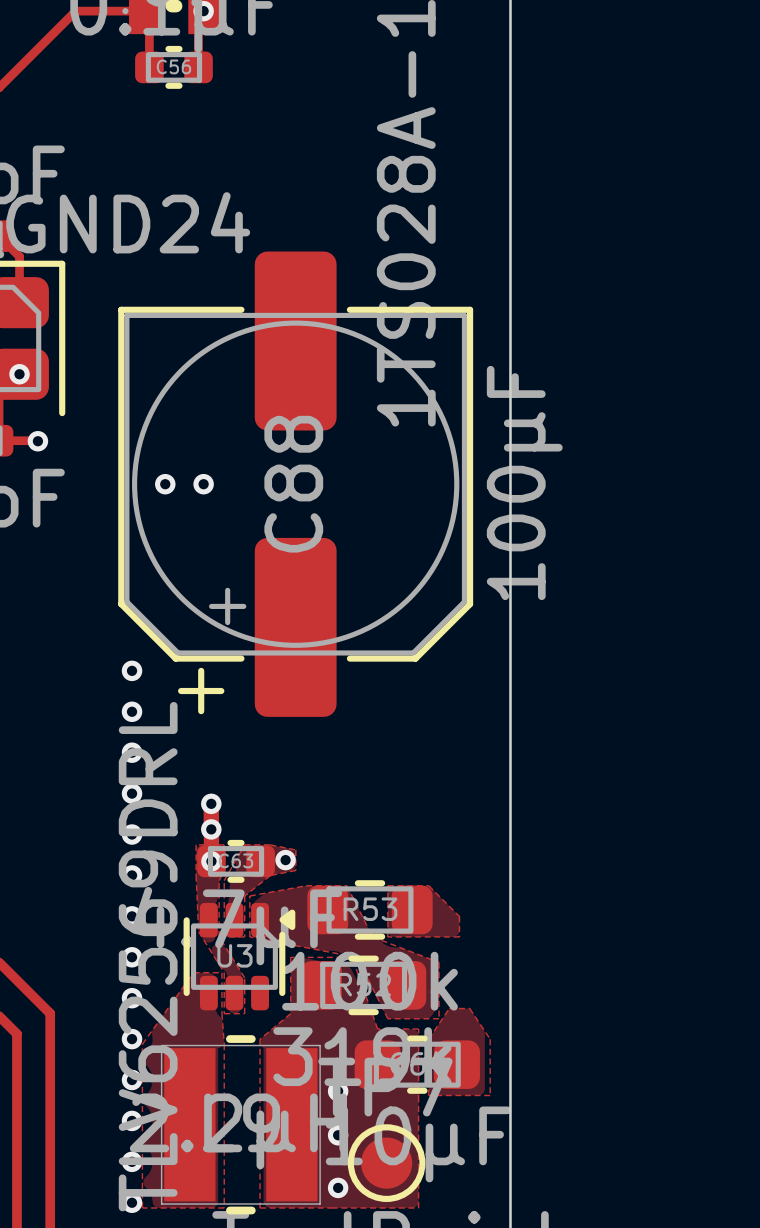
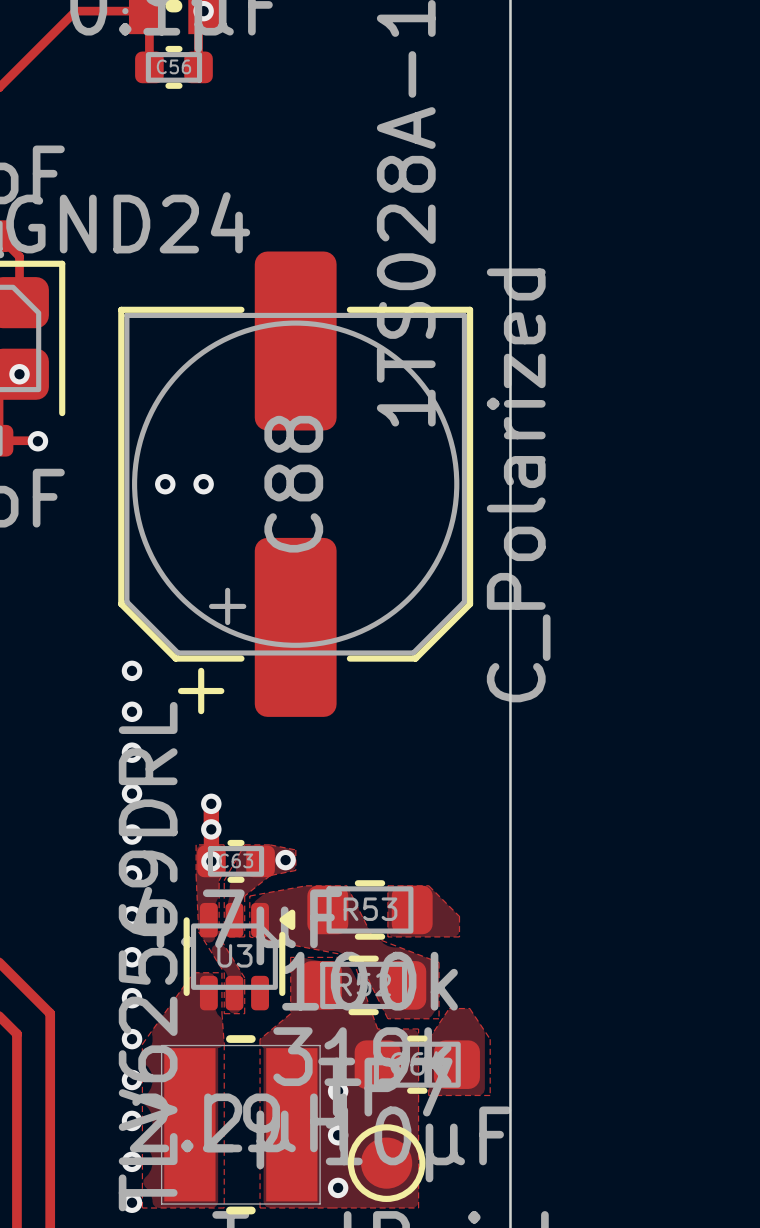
C88 value: 100μF (524, 482) -> C_Polarized (518, 485)

